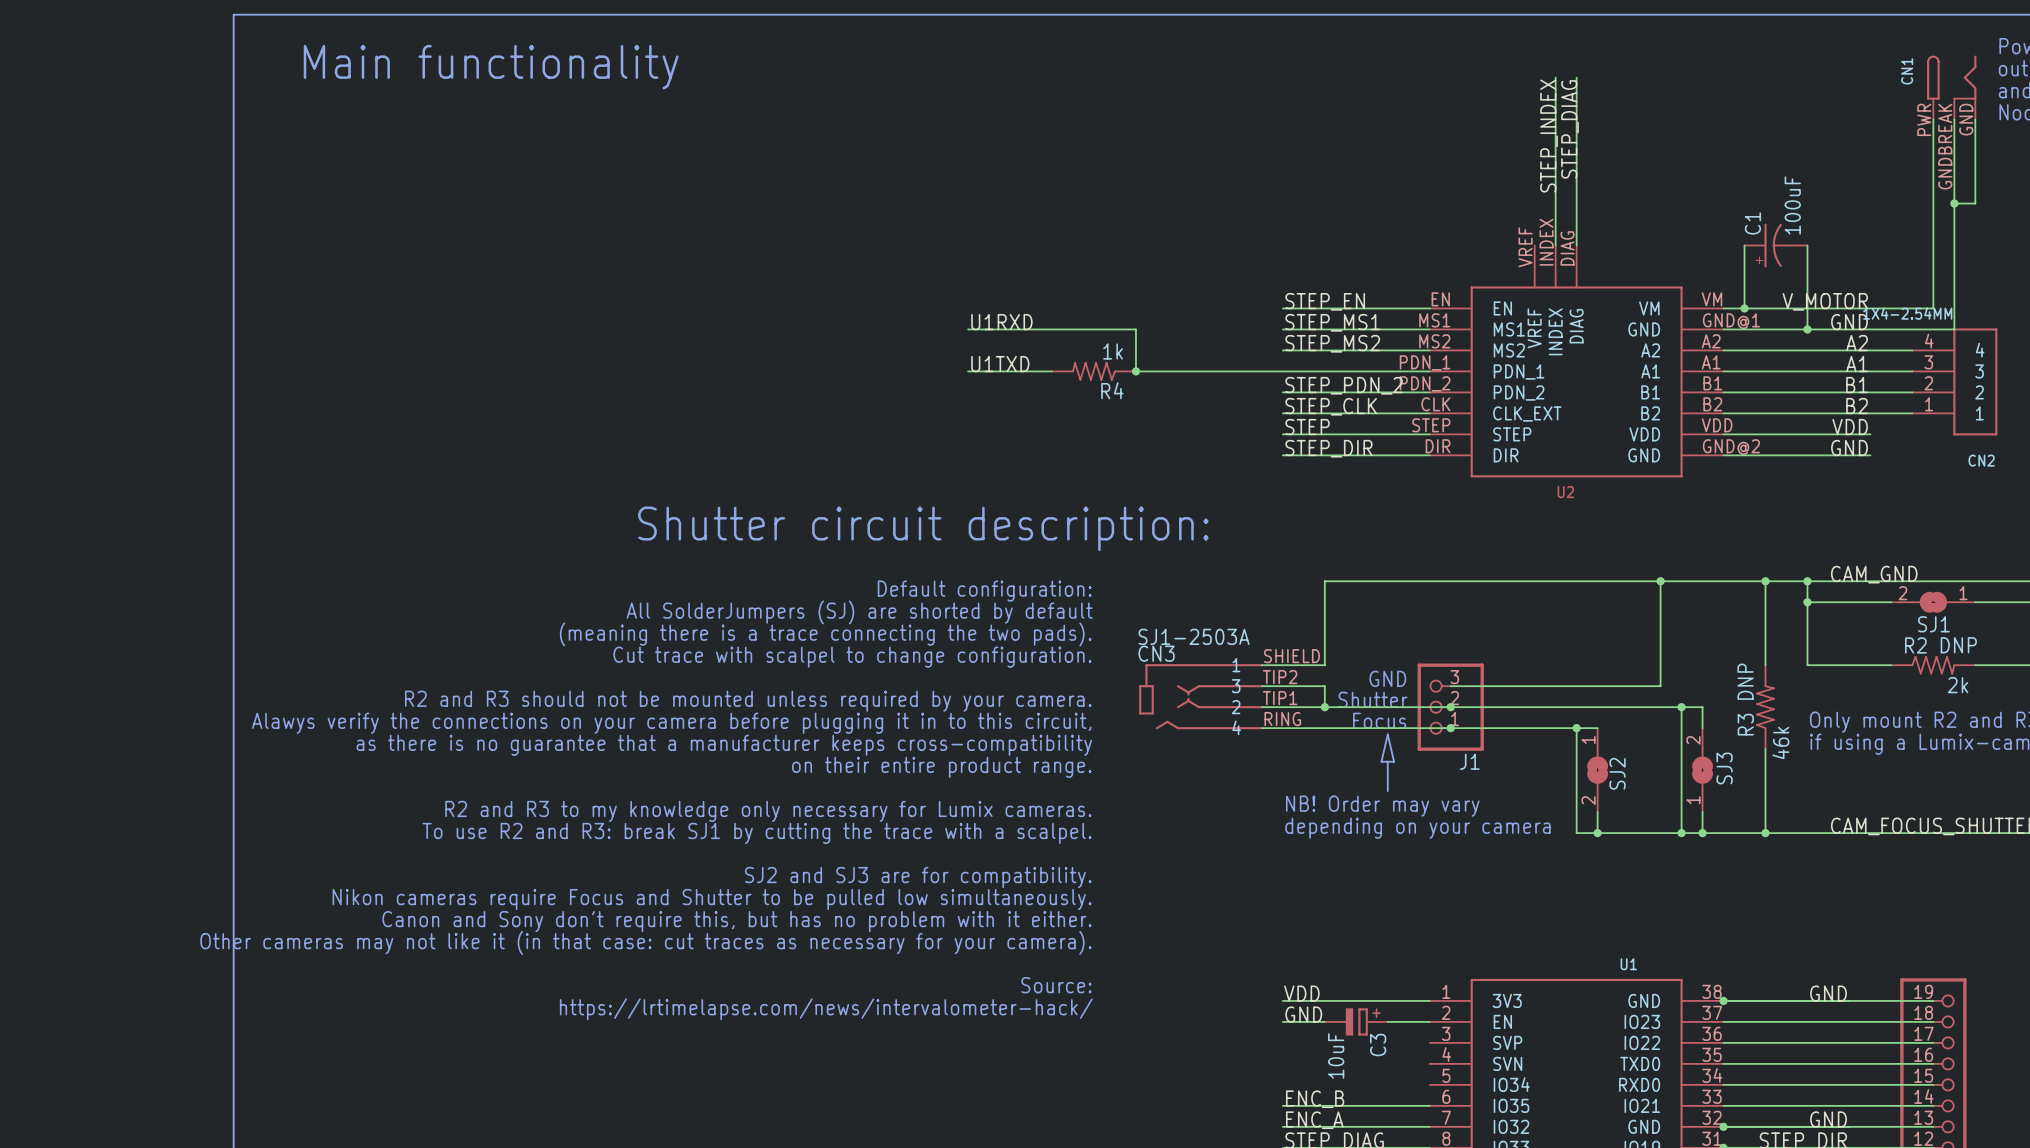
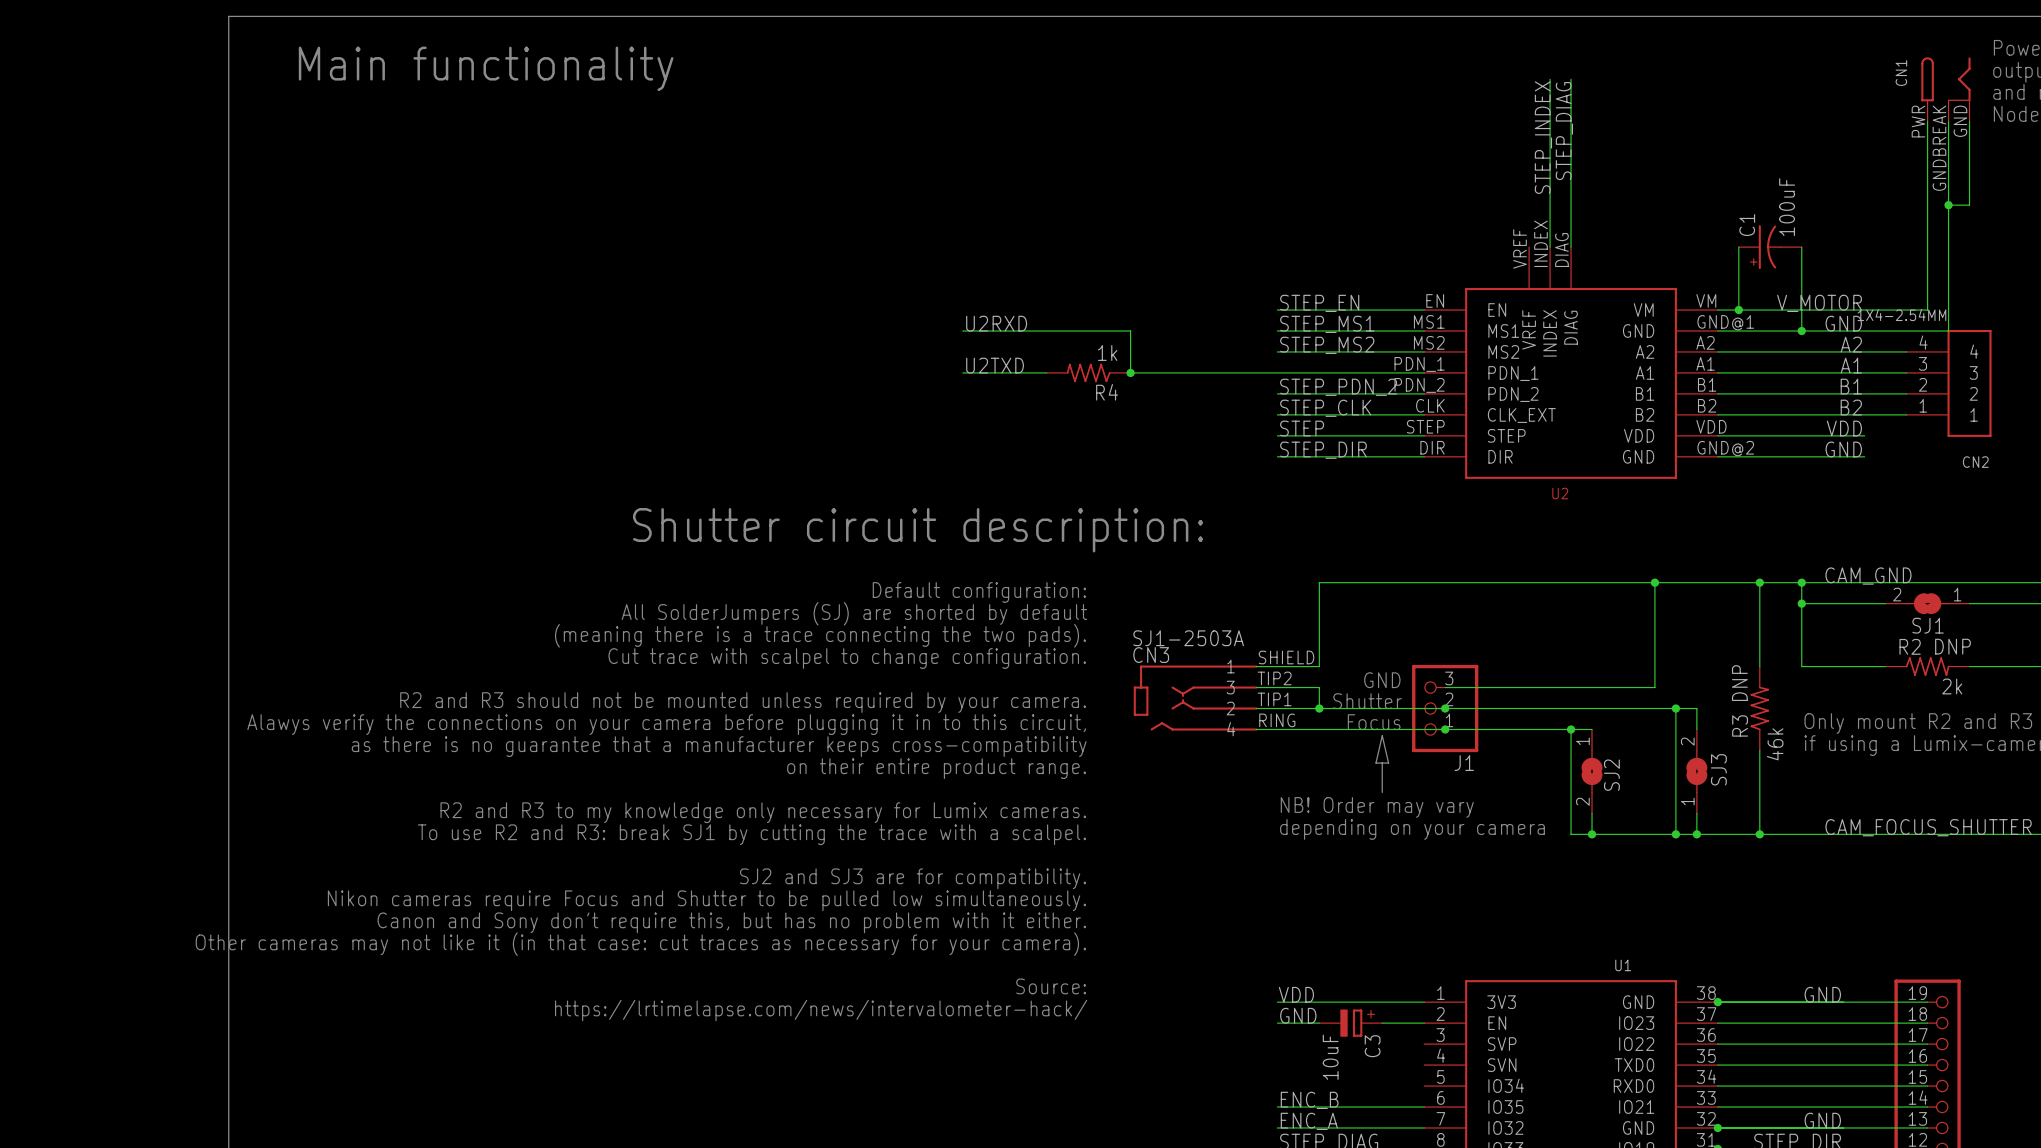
label: U1RXD (1001, 322) -> U2RXD (996, 323)
label: U1TXD (1000, 364) -> U2TXD (995, 365)

